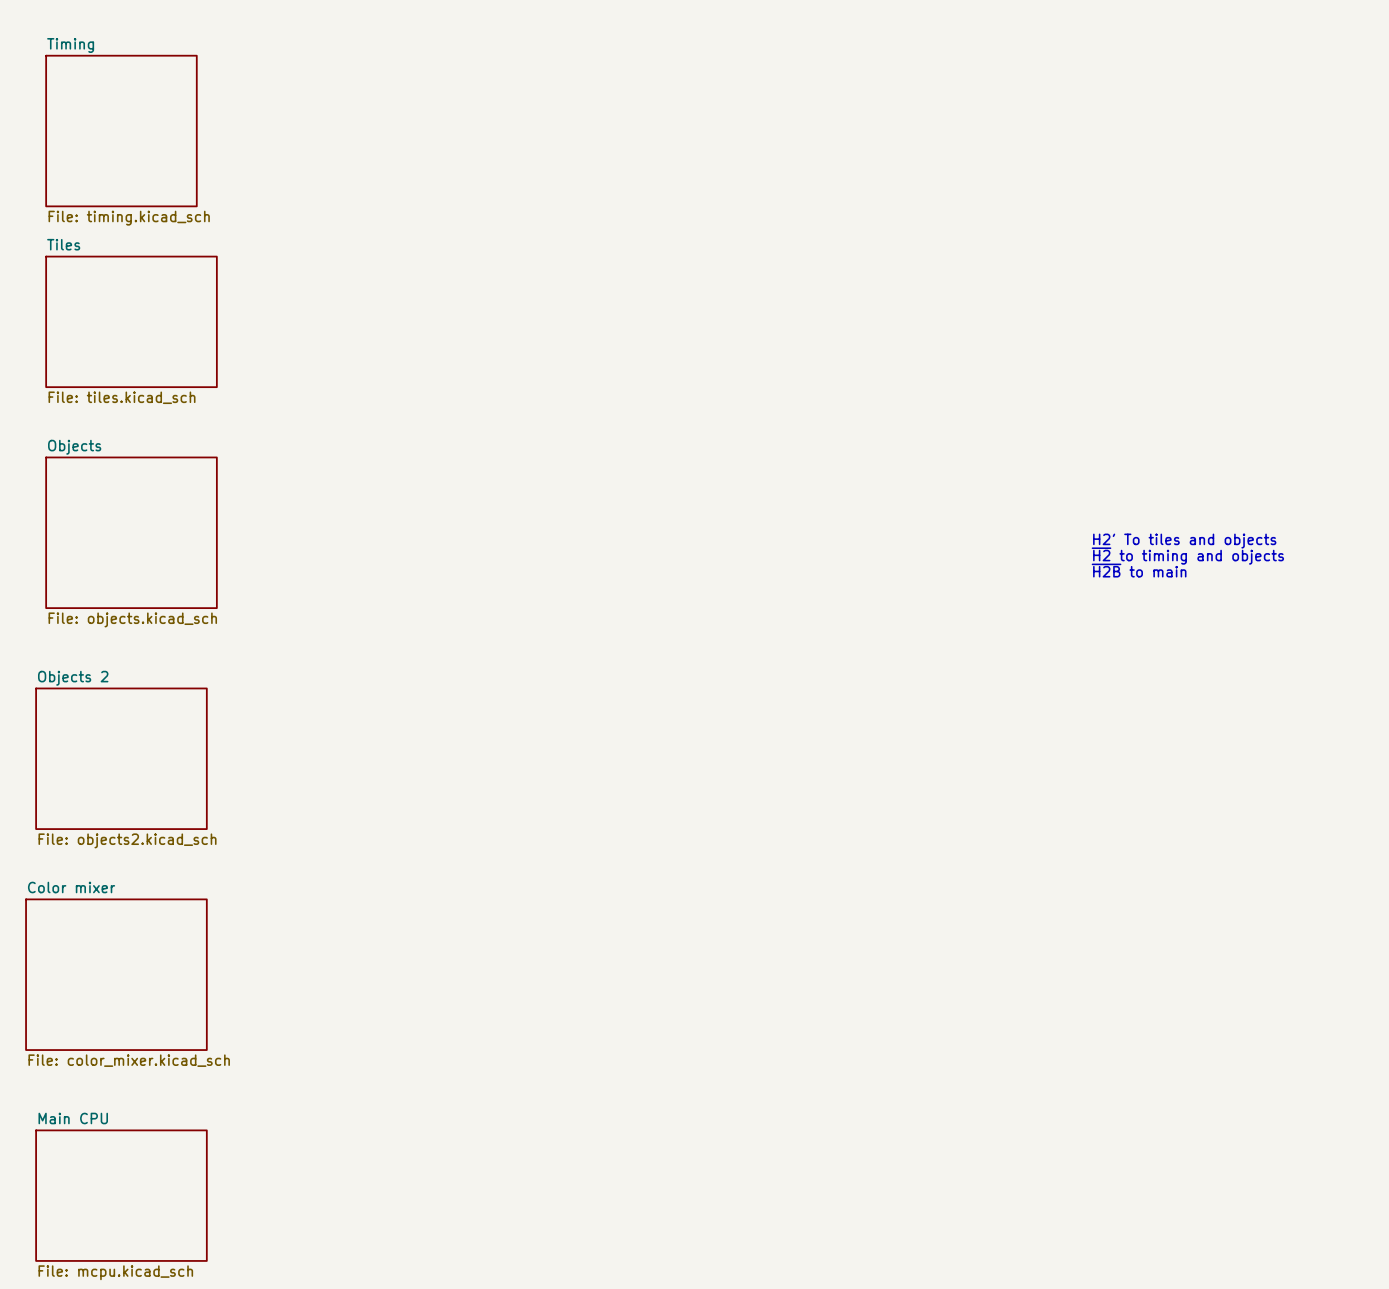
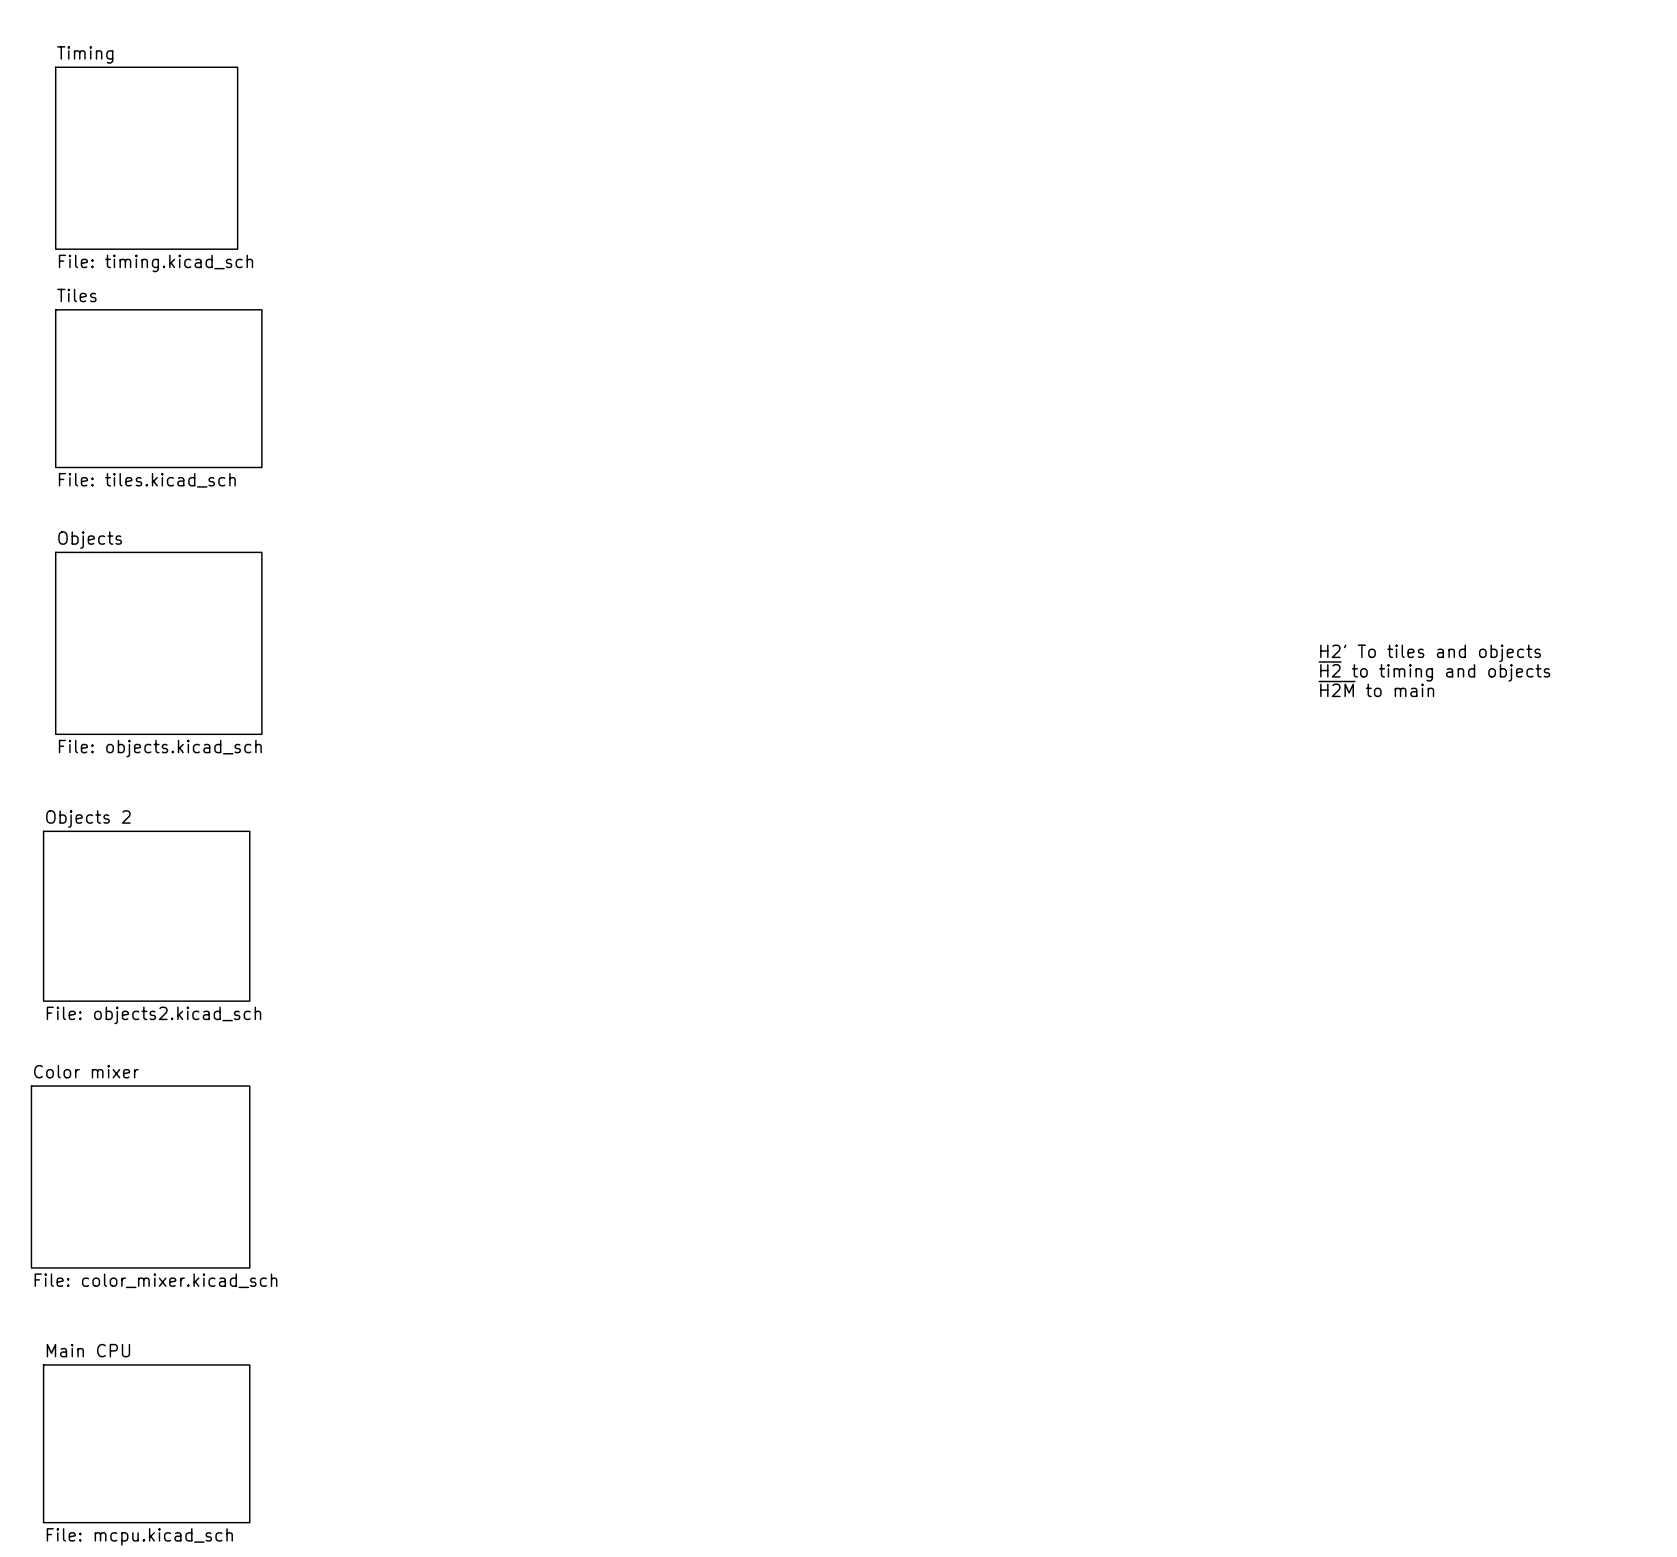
text: ~{H2B} to main (1139, 570) -> ~{H2M} to main (1376, 688)

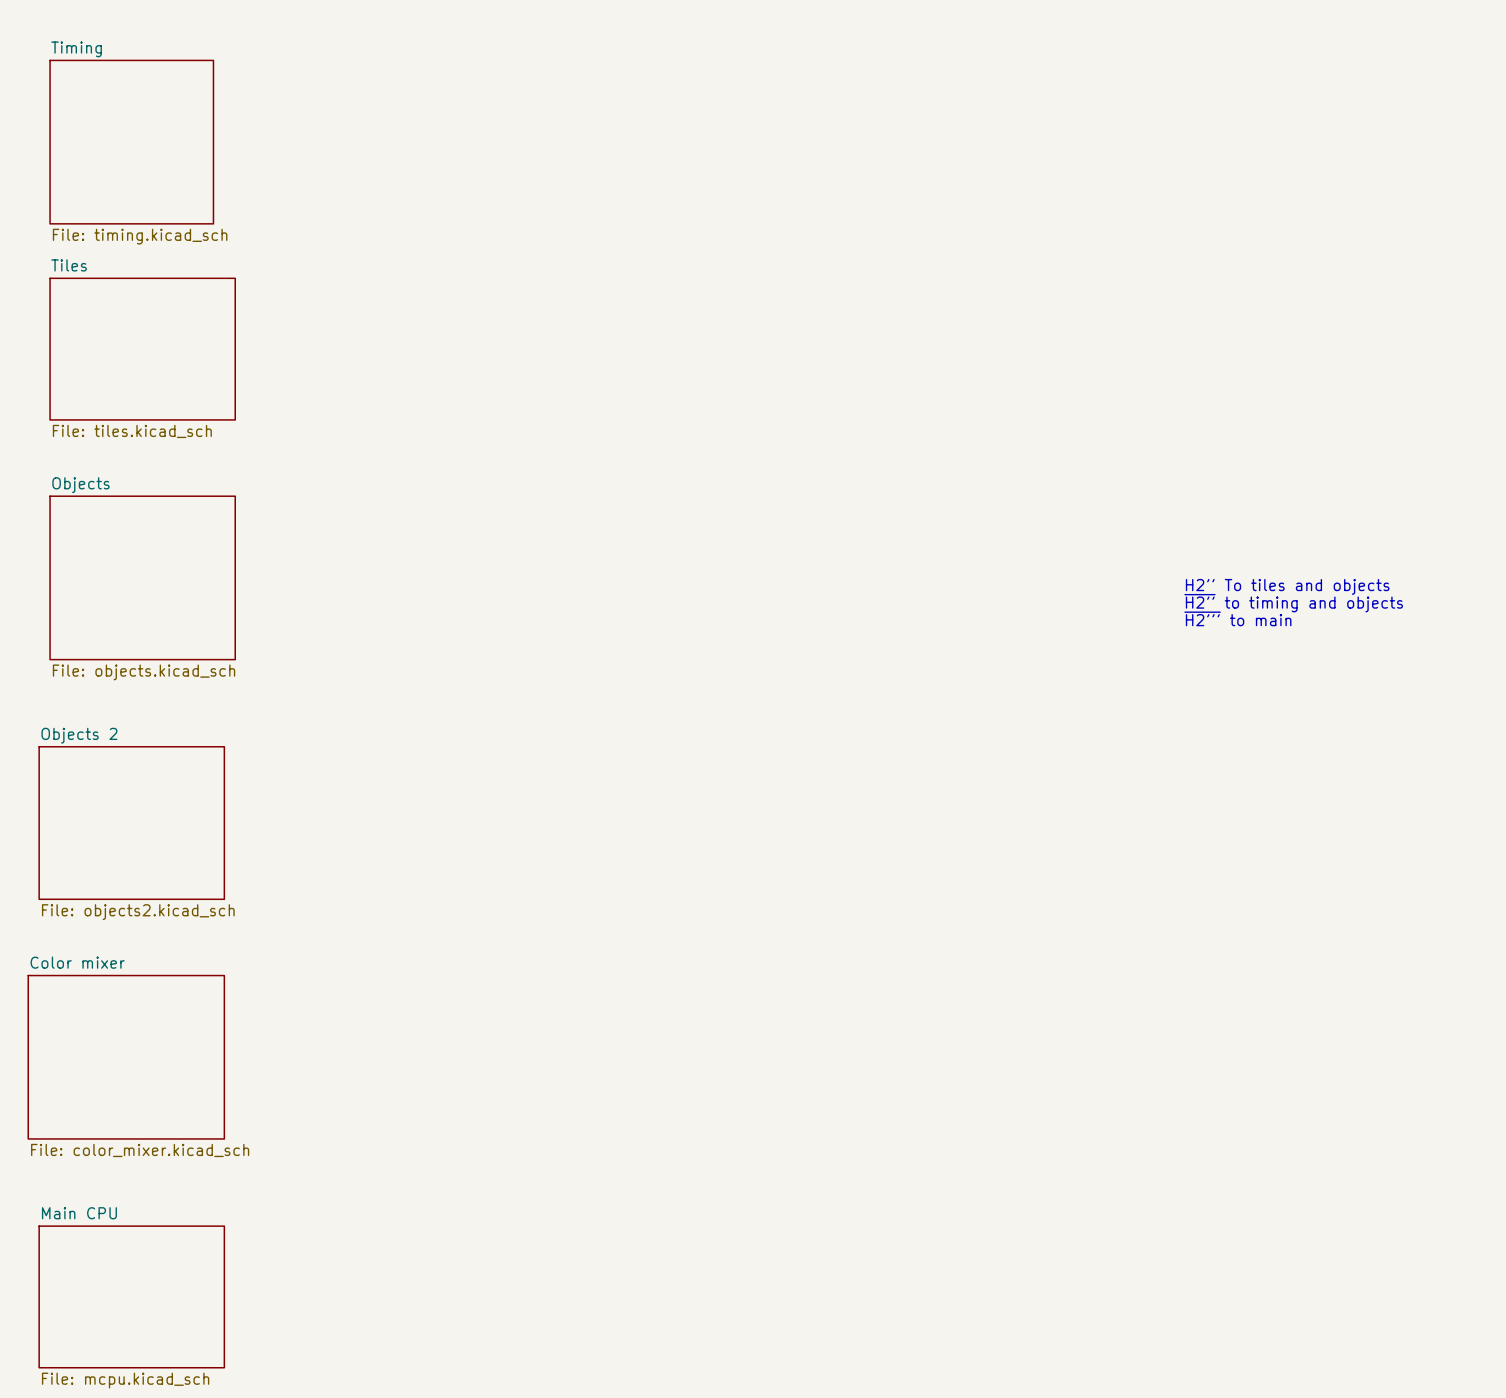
text: H2' To tiles and objects (1430, 653) -> H2'' To tiles and objects (1287, 586)
text: ~{H2} to timing and objects (1434, 671) -> ~{H2''} to timing and objects (1293, 603)
text: ~{H2M} to main (1376, 688) -> ~{H2'''} to main (1237, 618)

